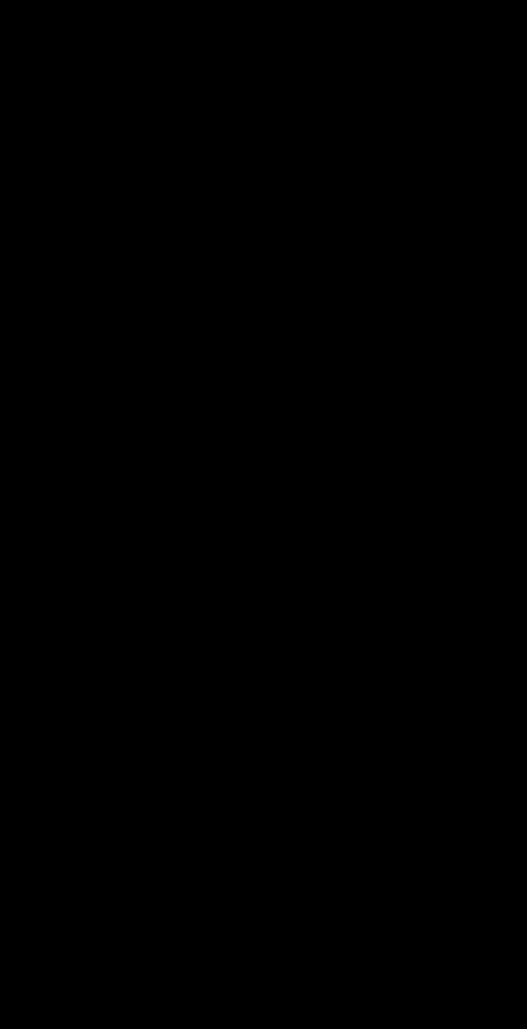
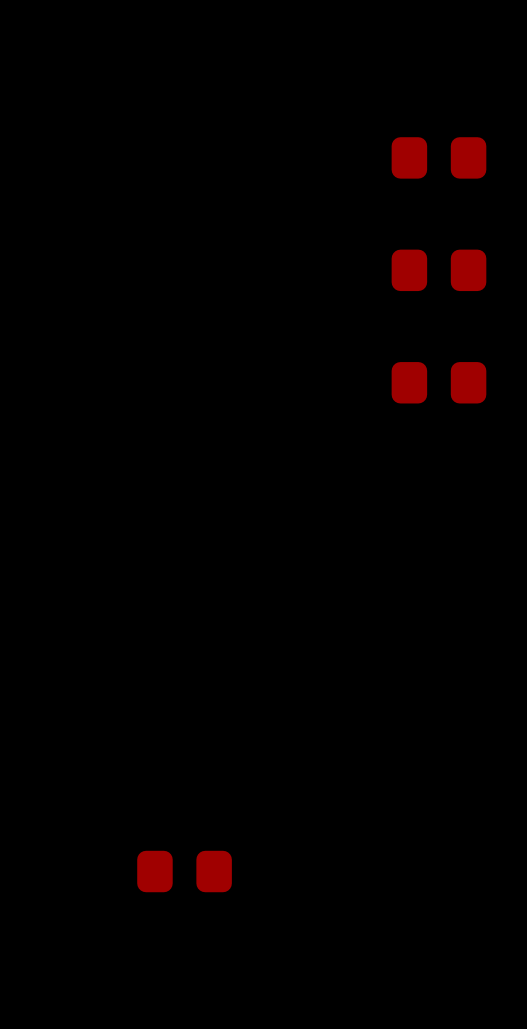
part: none -> (438, 157)
part: none -> (438, 270)
part: none -> (438, 382)
part: none -> (184, 871)

